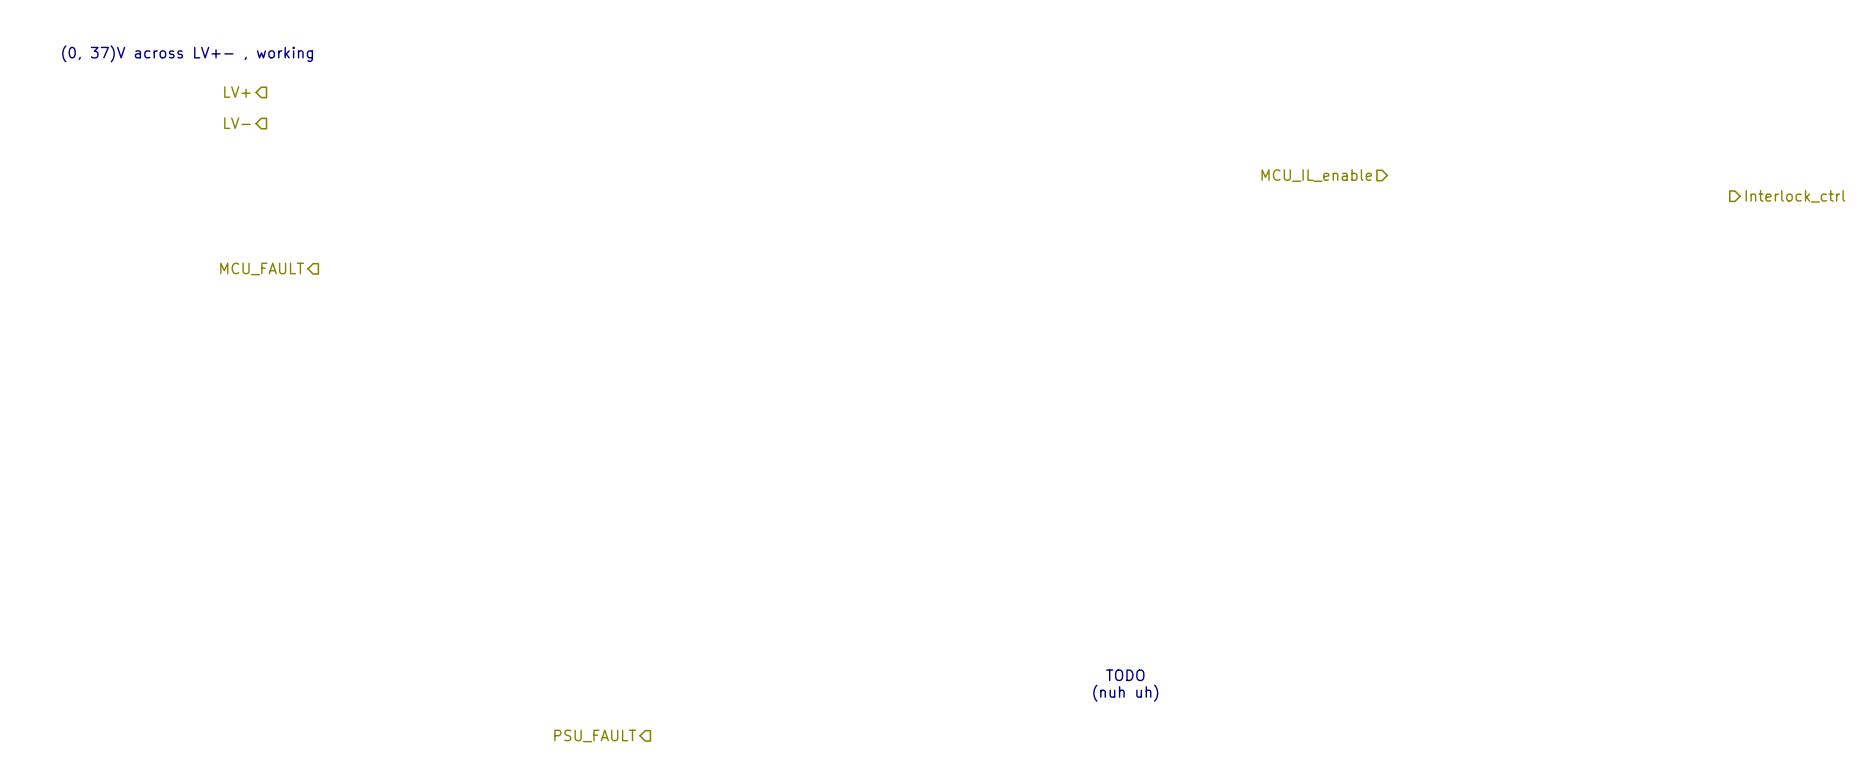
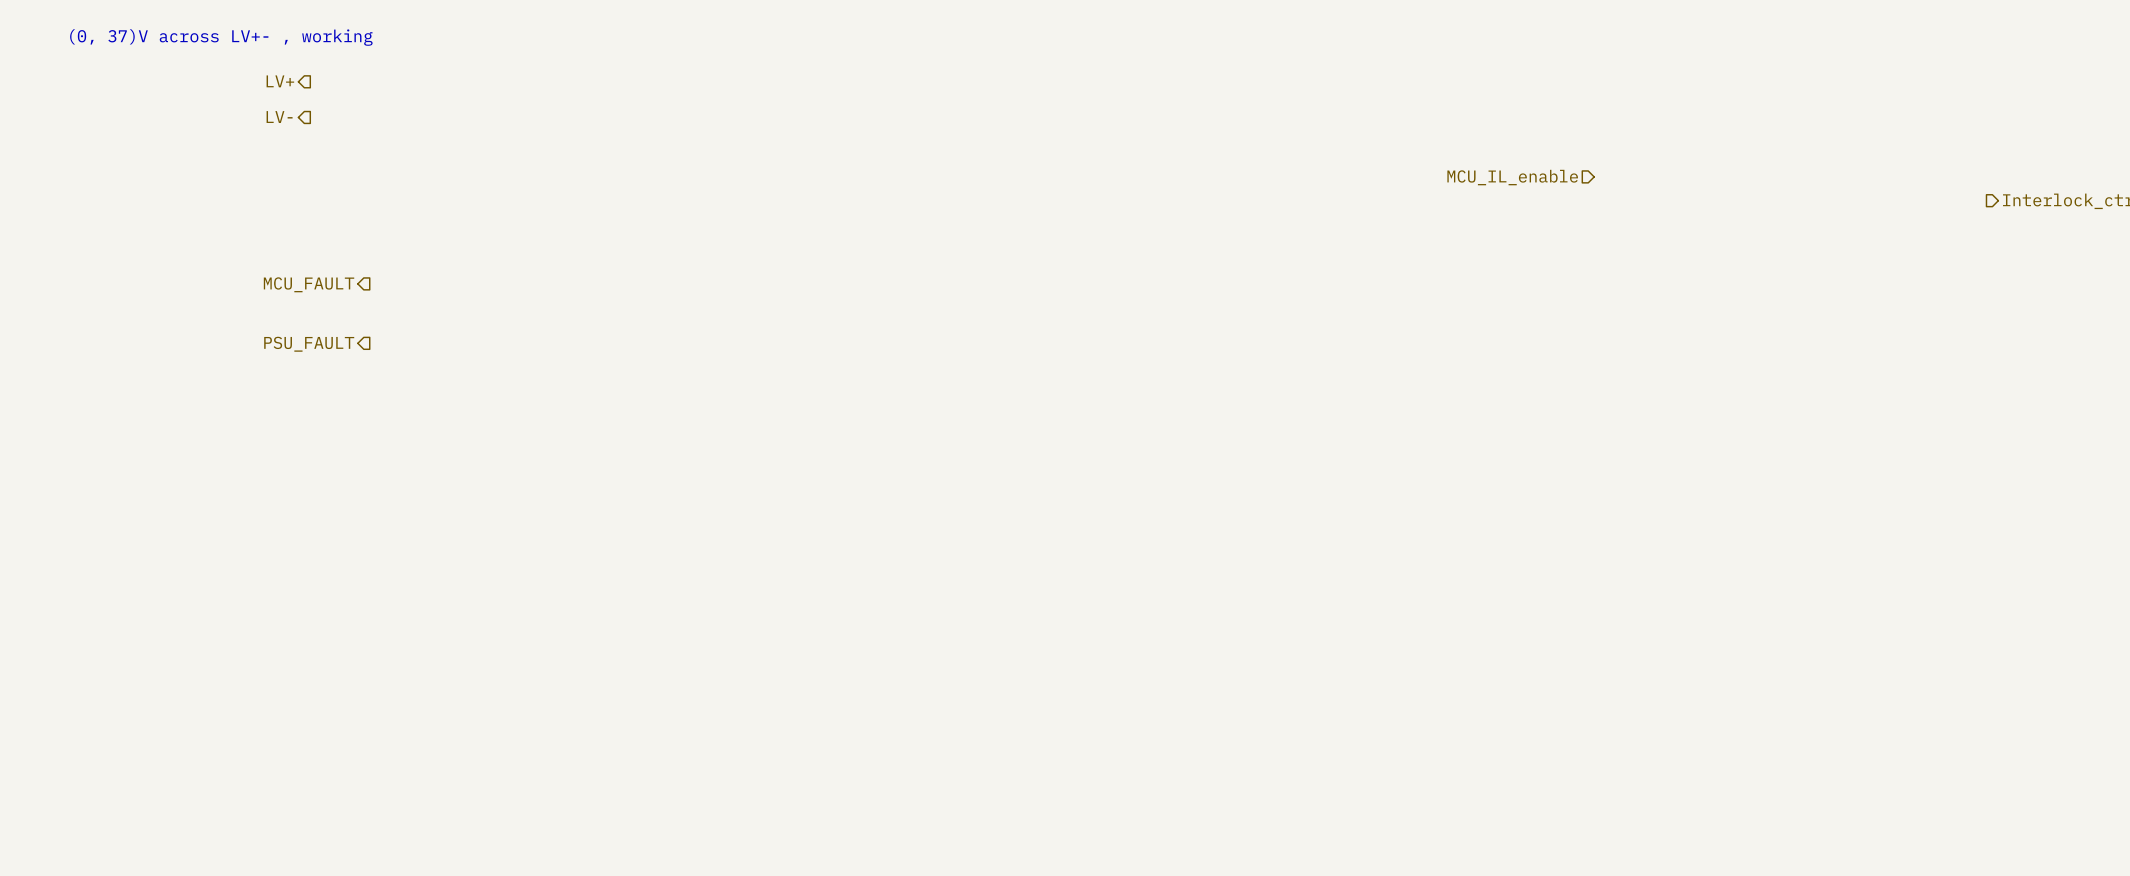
hierarchical label: none -> PSU_FAULT (309, 344)
text: TODO (1125, 675) -> none
text: (nuh uh) (1125, 693) -> none
hierarchical label: PSU_FAULT (595, 735) -> none

